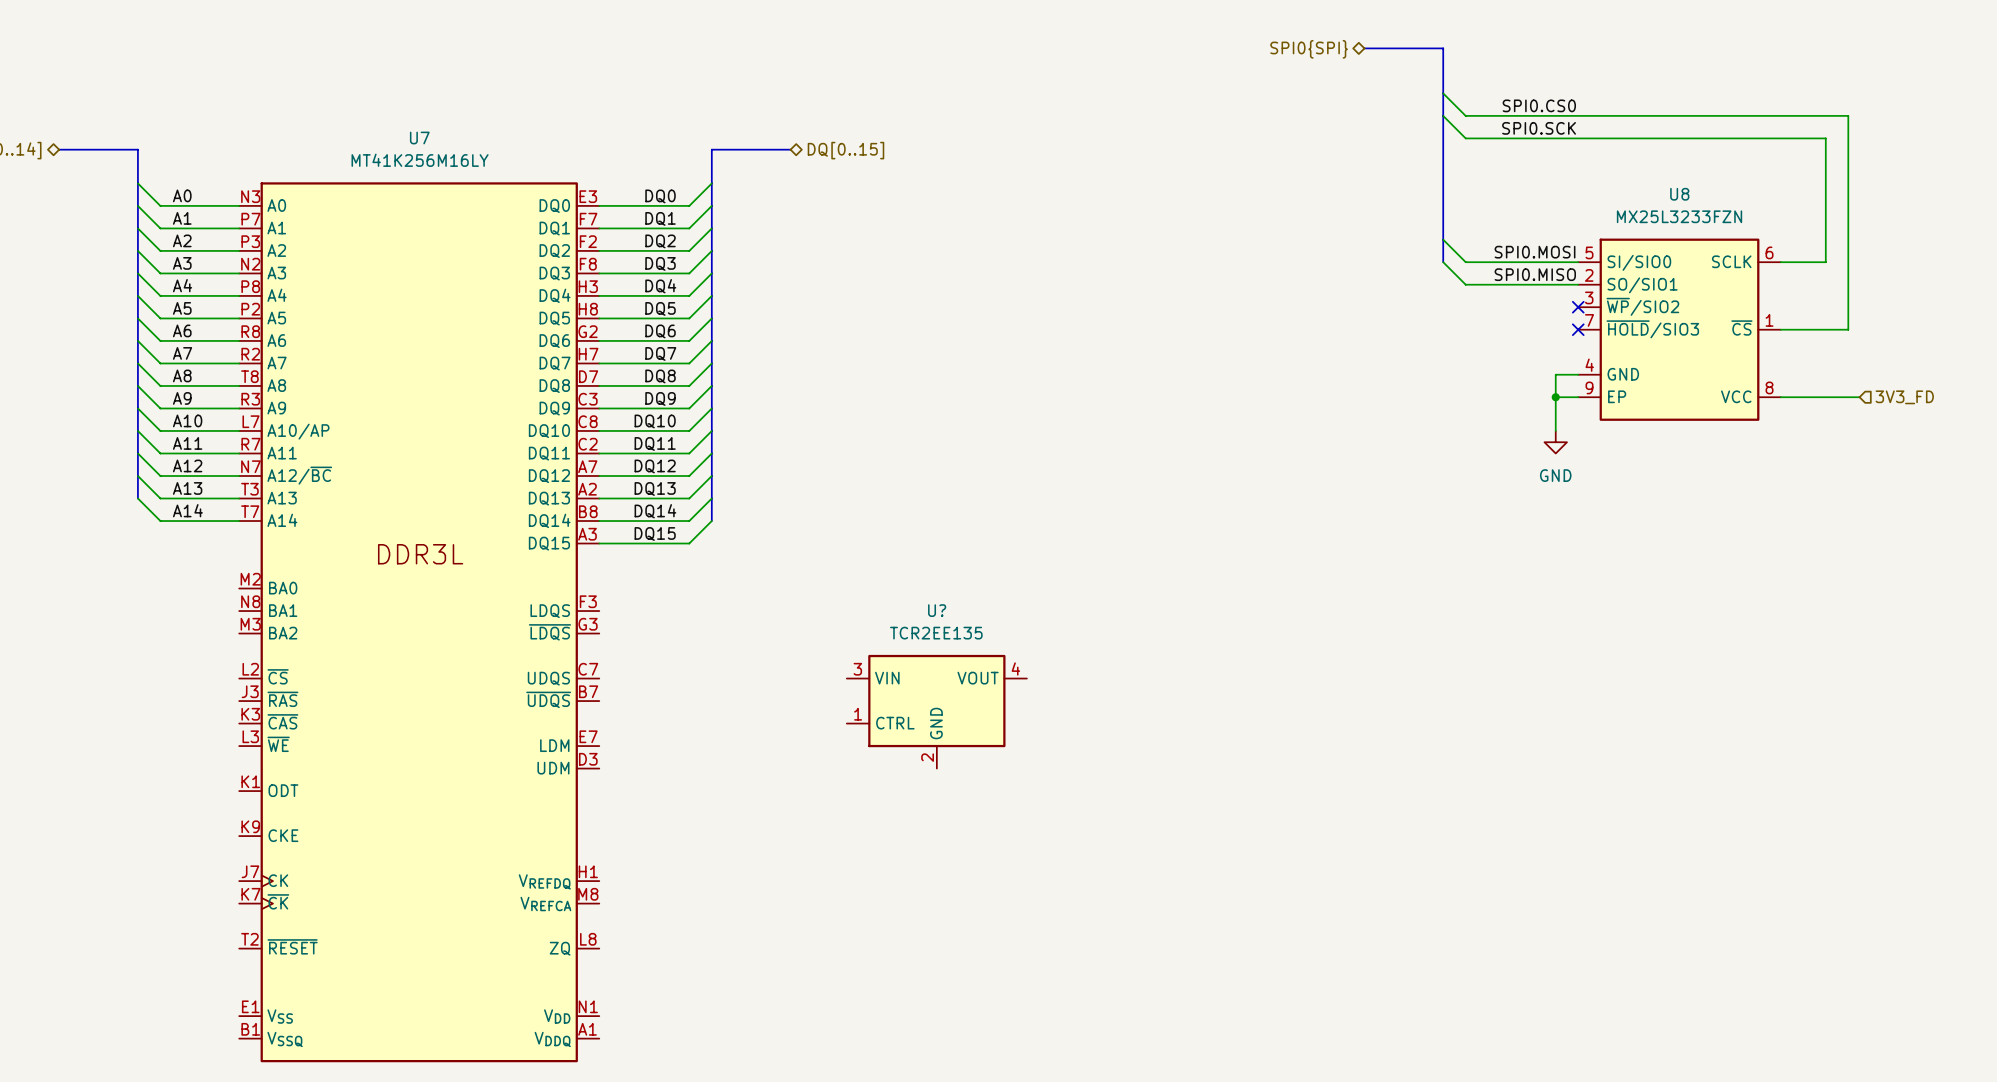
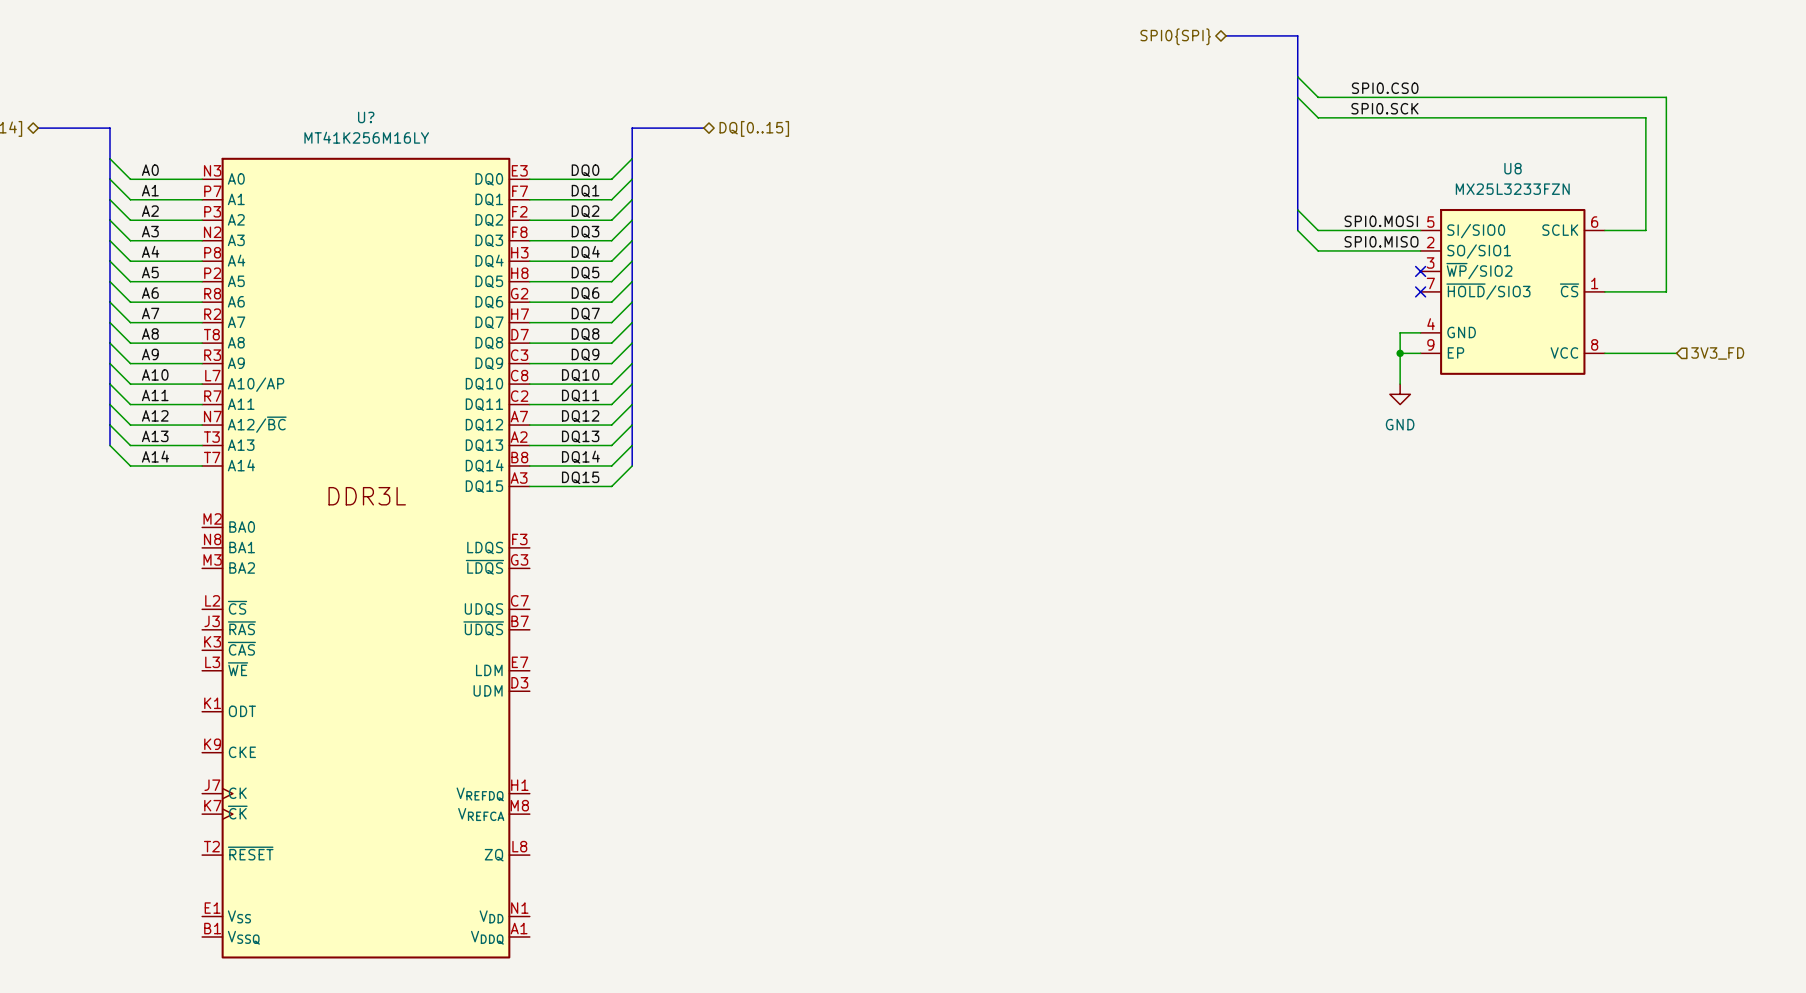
U7 name: U7 (419, 138) -> U? (366, 117)
U?: TCR2EE135 (936, 711) -> none

